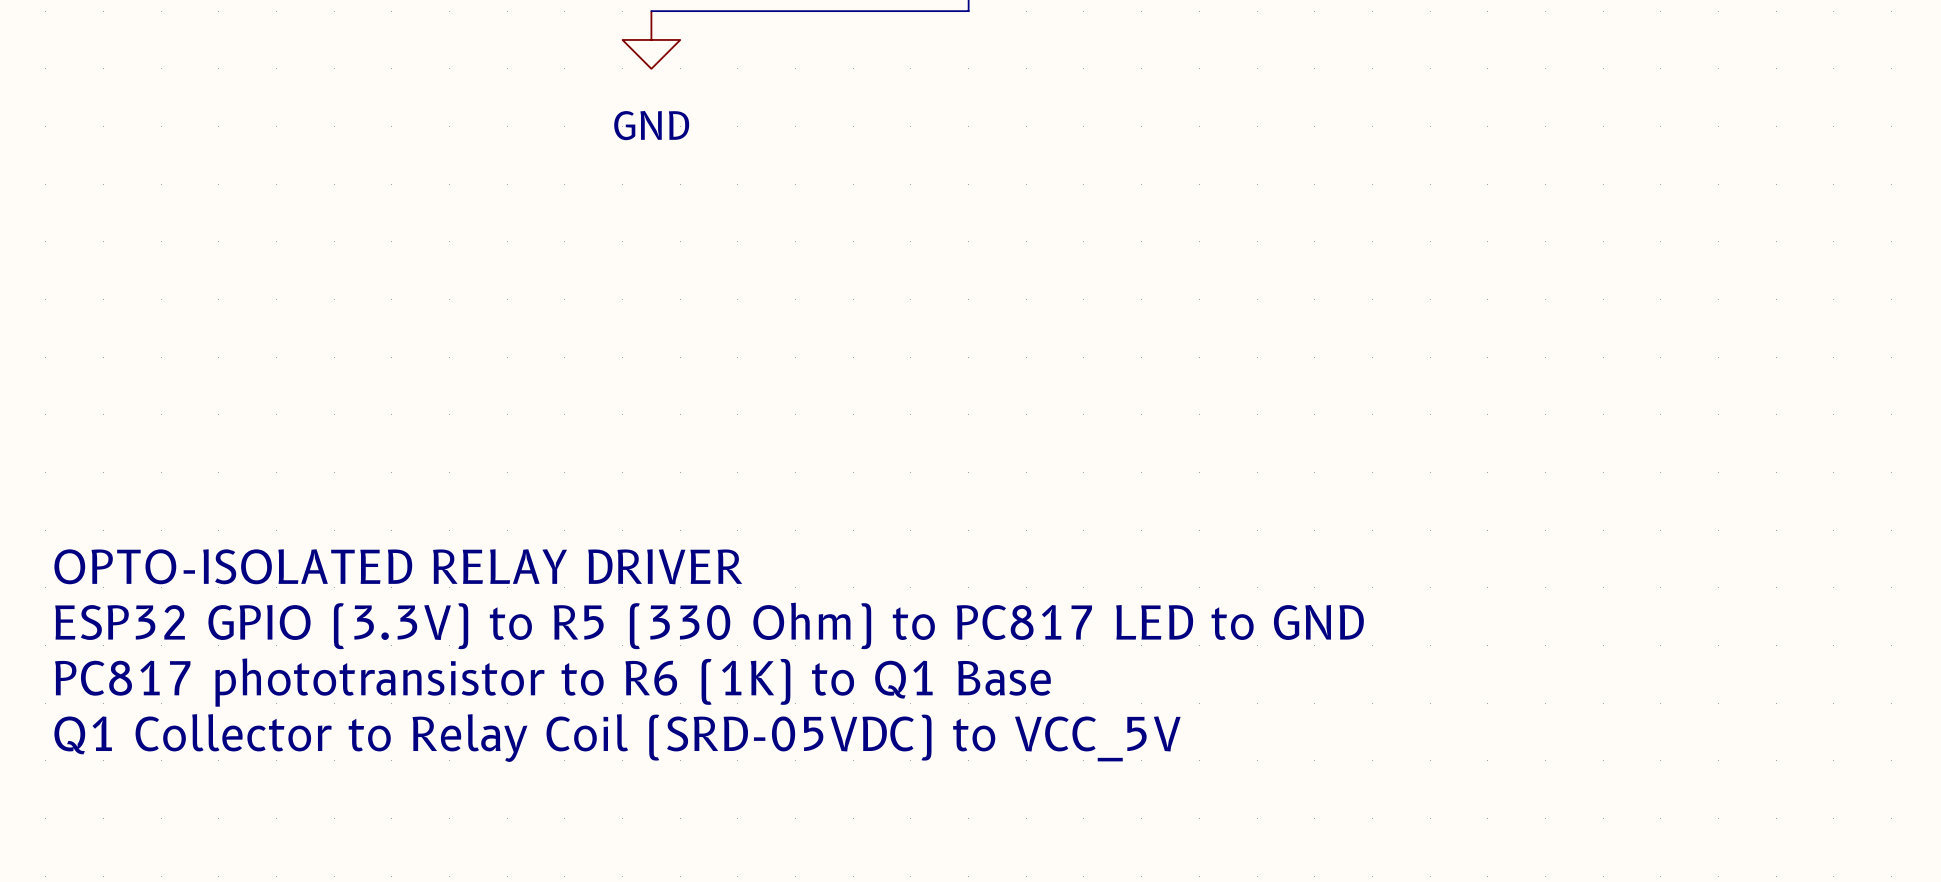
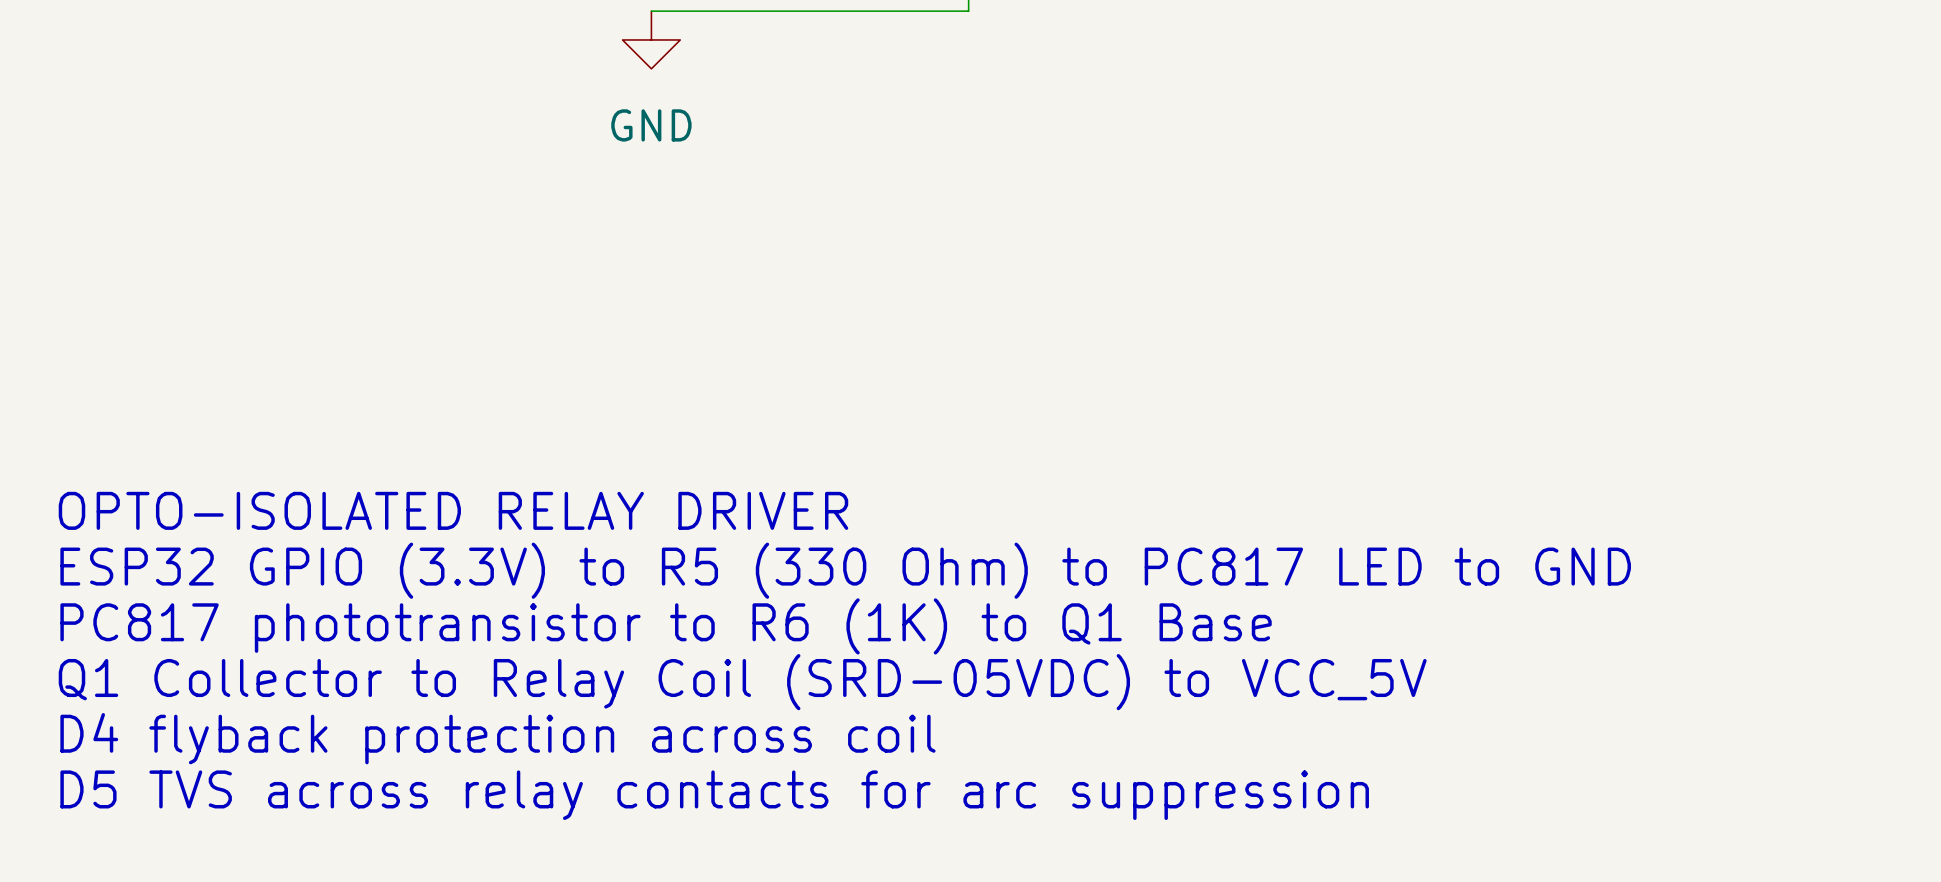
text: none -> OPTO-ISOLATED RELAY DRIVER (453, 510)
text: OPTO-ISOLATED RELAY DRIVER (398, 566) -> ESP32 GPIO (3.3V) to R5 (330 Ohm) to PC817 LED to GND (845, 570)
text: ESP32 GPIO (3.3V) to R5 (330 Ohm) to PC817 LED to GND (709, 625) -> PC817 phototransistor to R6 (1K) to Q1 Base (666, 626)
text: PC817 phototransistor to R6 (1K) to Q1 Base (552, 682) -> Q1 Collector to Relay Coil (SRD-05VDC) to VCC_5V (742, 682)
text: Q1 Collector to Relay Coil (SRD-05VDC) to VCC_5V (617, 738) -> D4 flyback protection across coil (497, 738)
text: none -> D5 TVS across relay contacts for arc suppression (714, 795)

